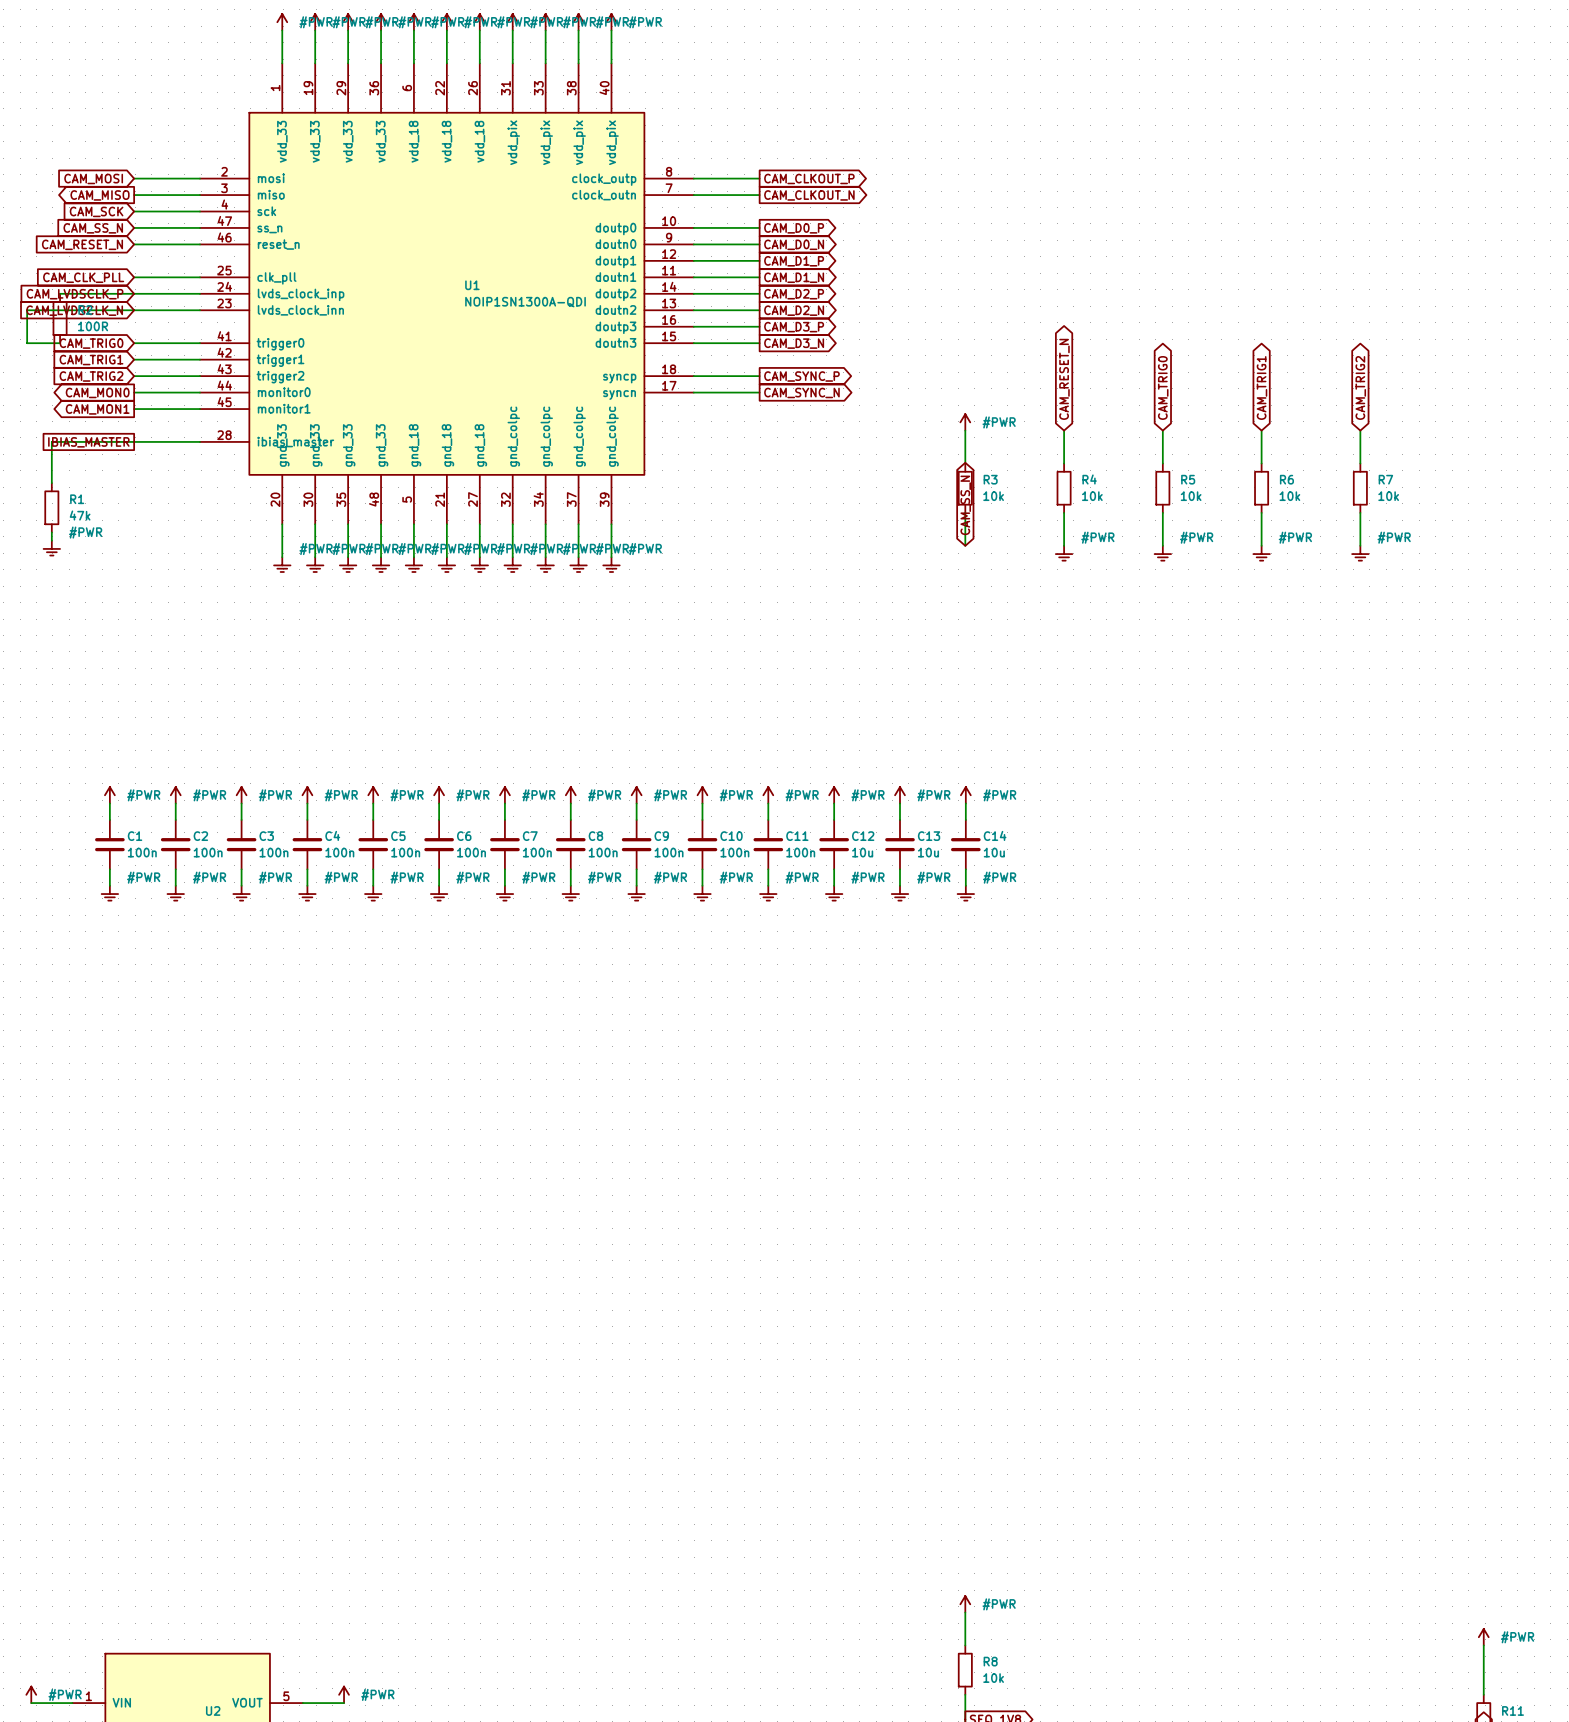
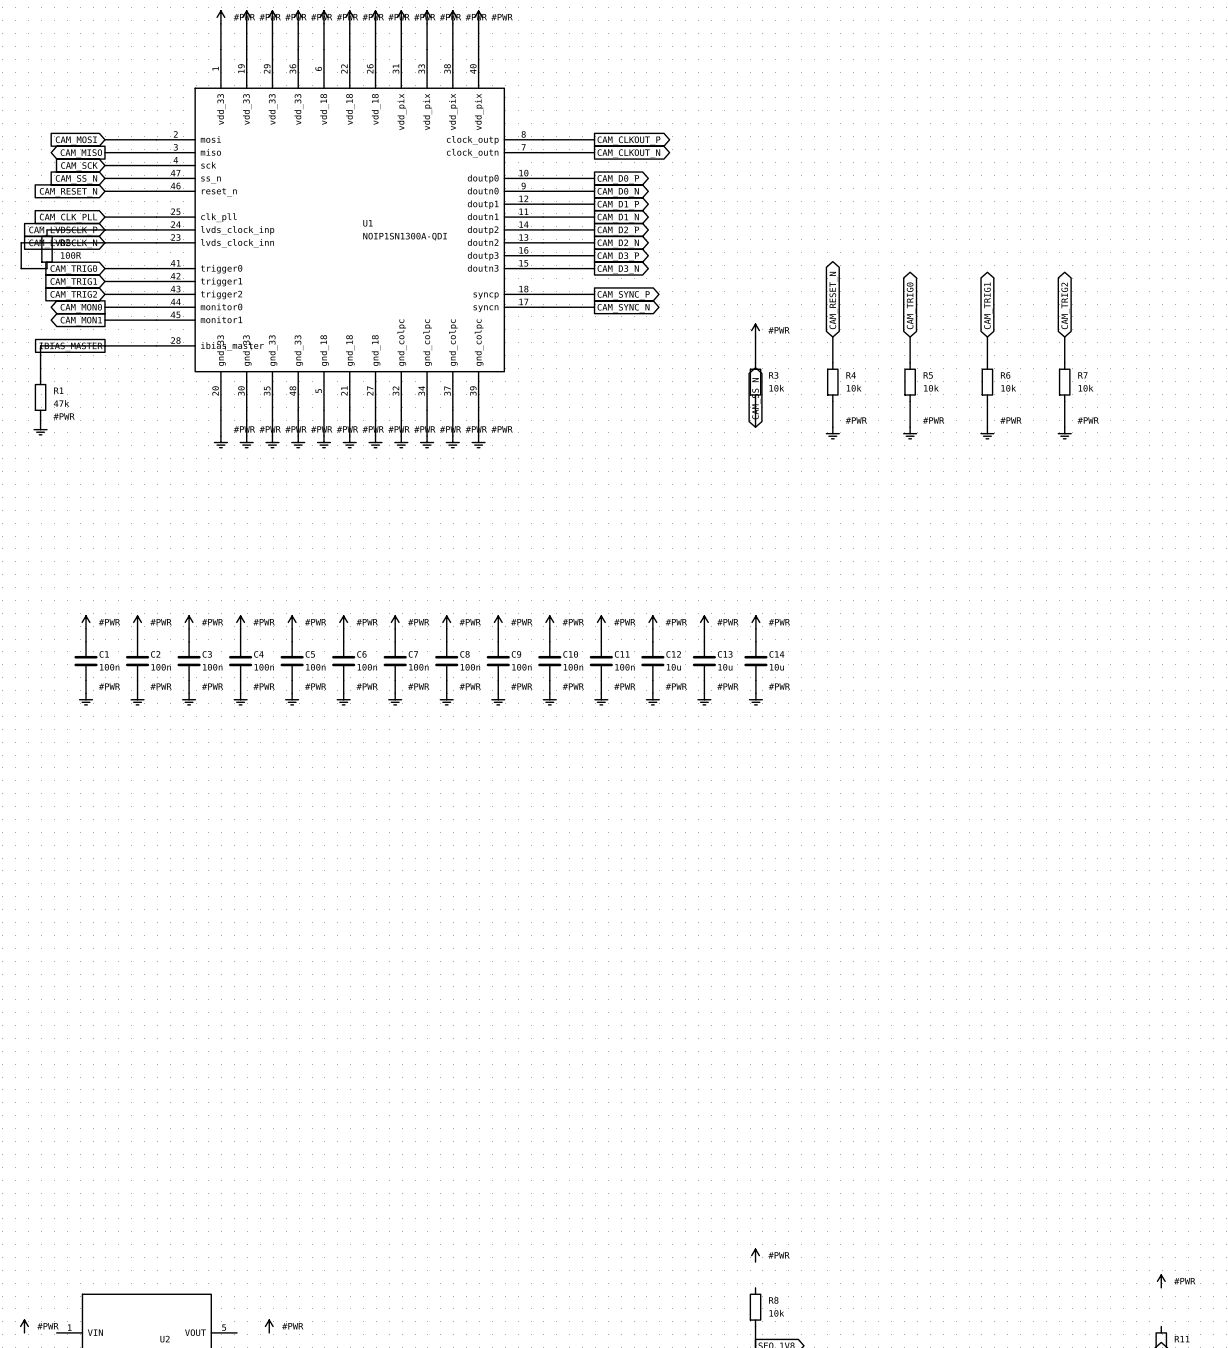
wire: (965, 1612) (965, 1645) -> none
wire: (1483, 1645) (1483, 1694) -> none
wire: (31, 1703) (72, 1703) -> none
wire: (302, 1703) (344, 1703) -> none

